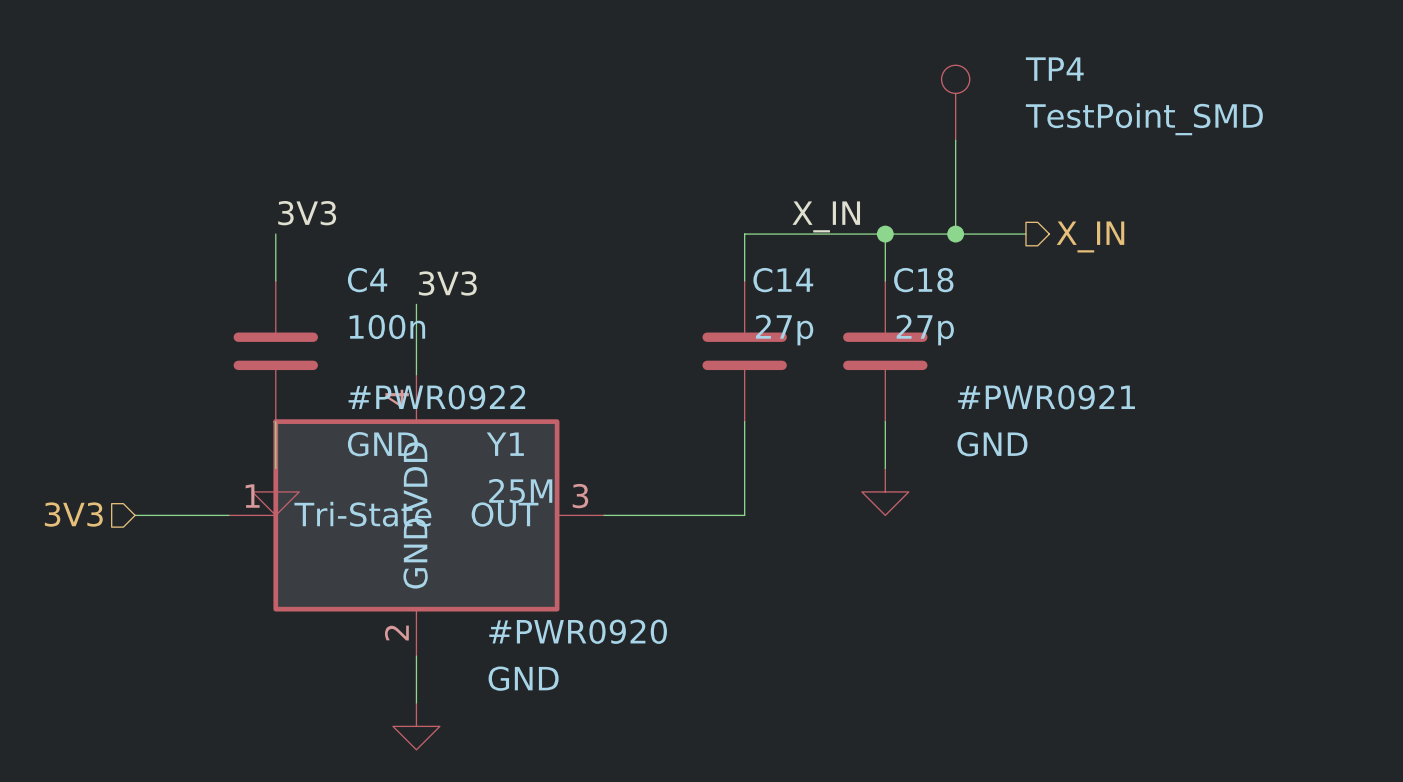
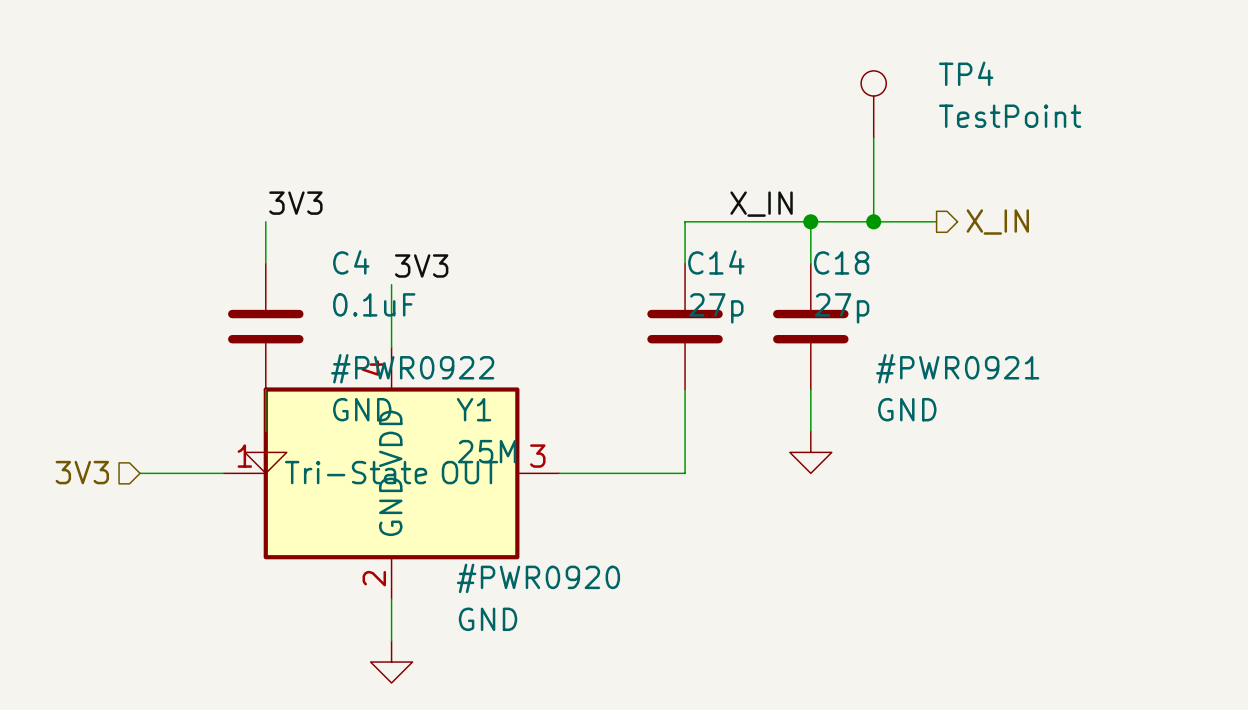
TP4 value: TestPoint_SMD (1144, 119) -> TestPoint (1010, 116)
C4 value: 100n (387, 326) -> 0.1uF (374, 304)

